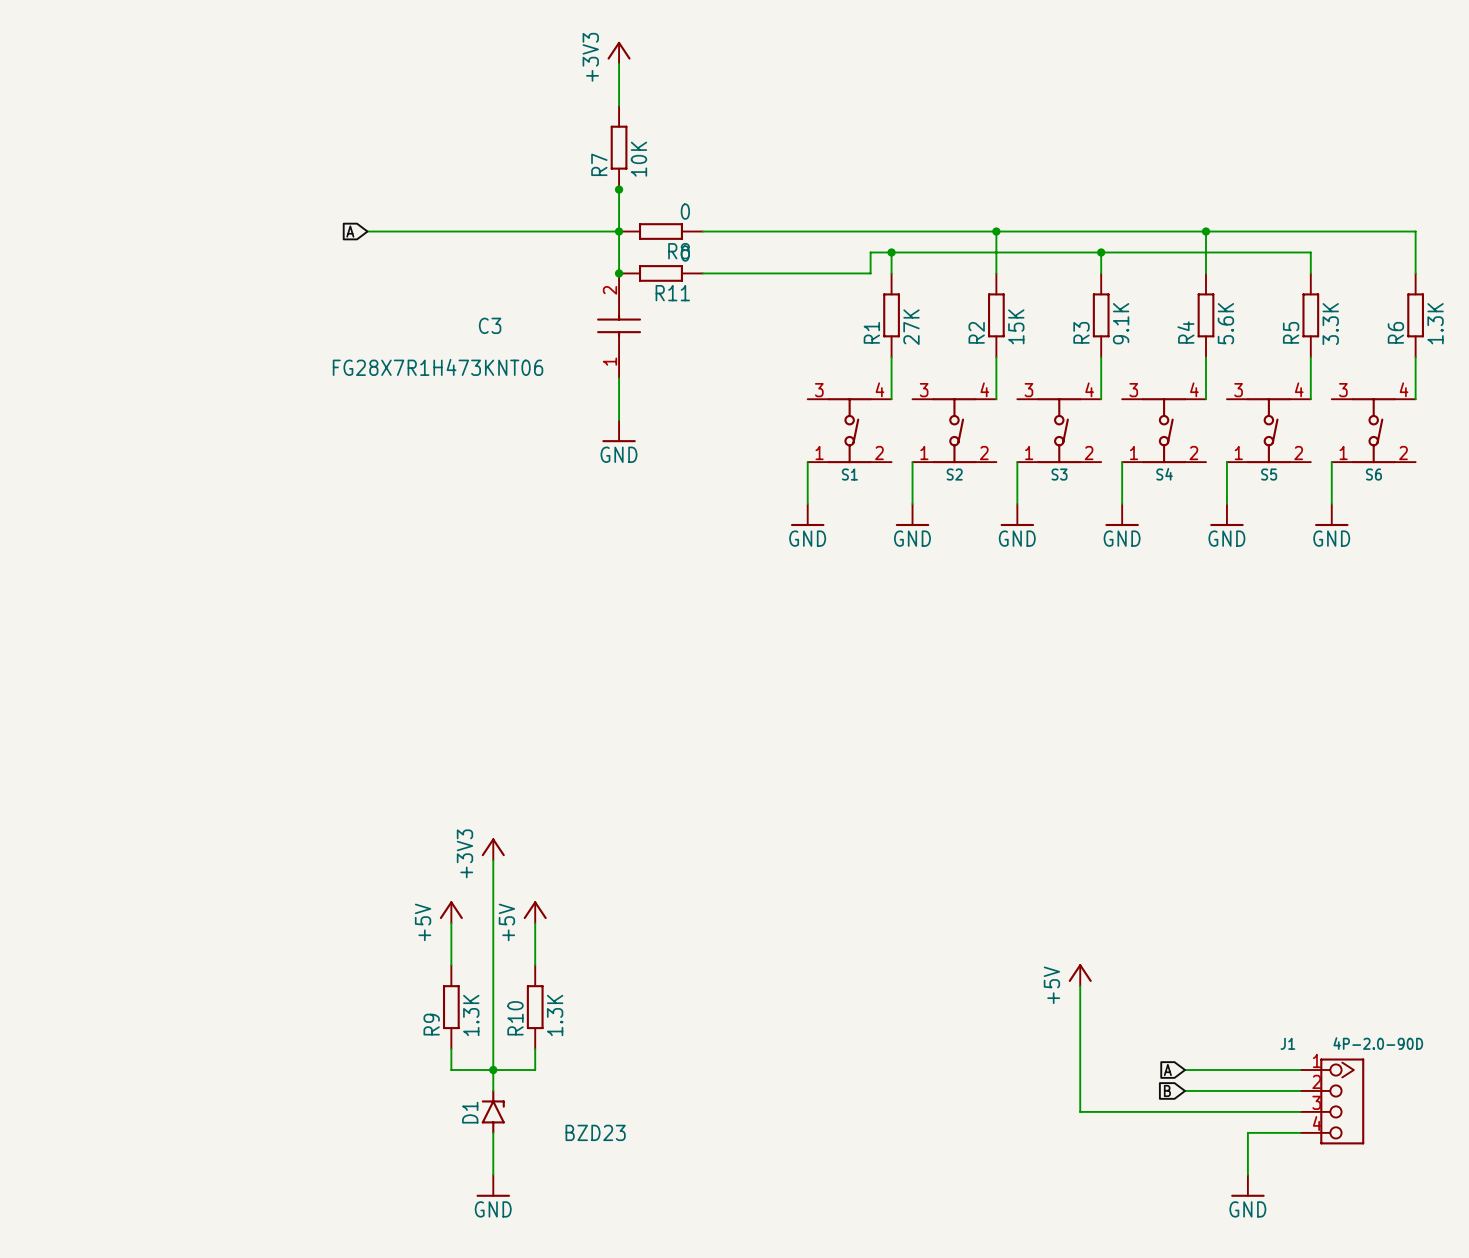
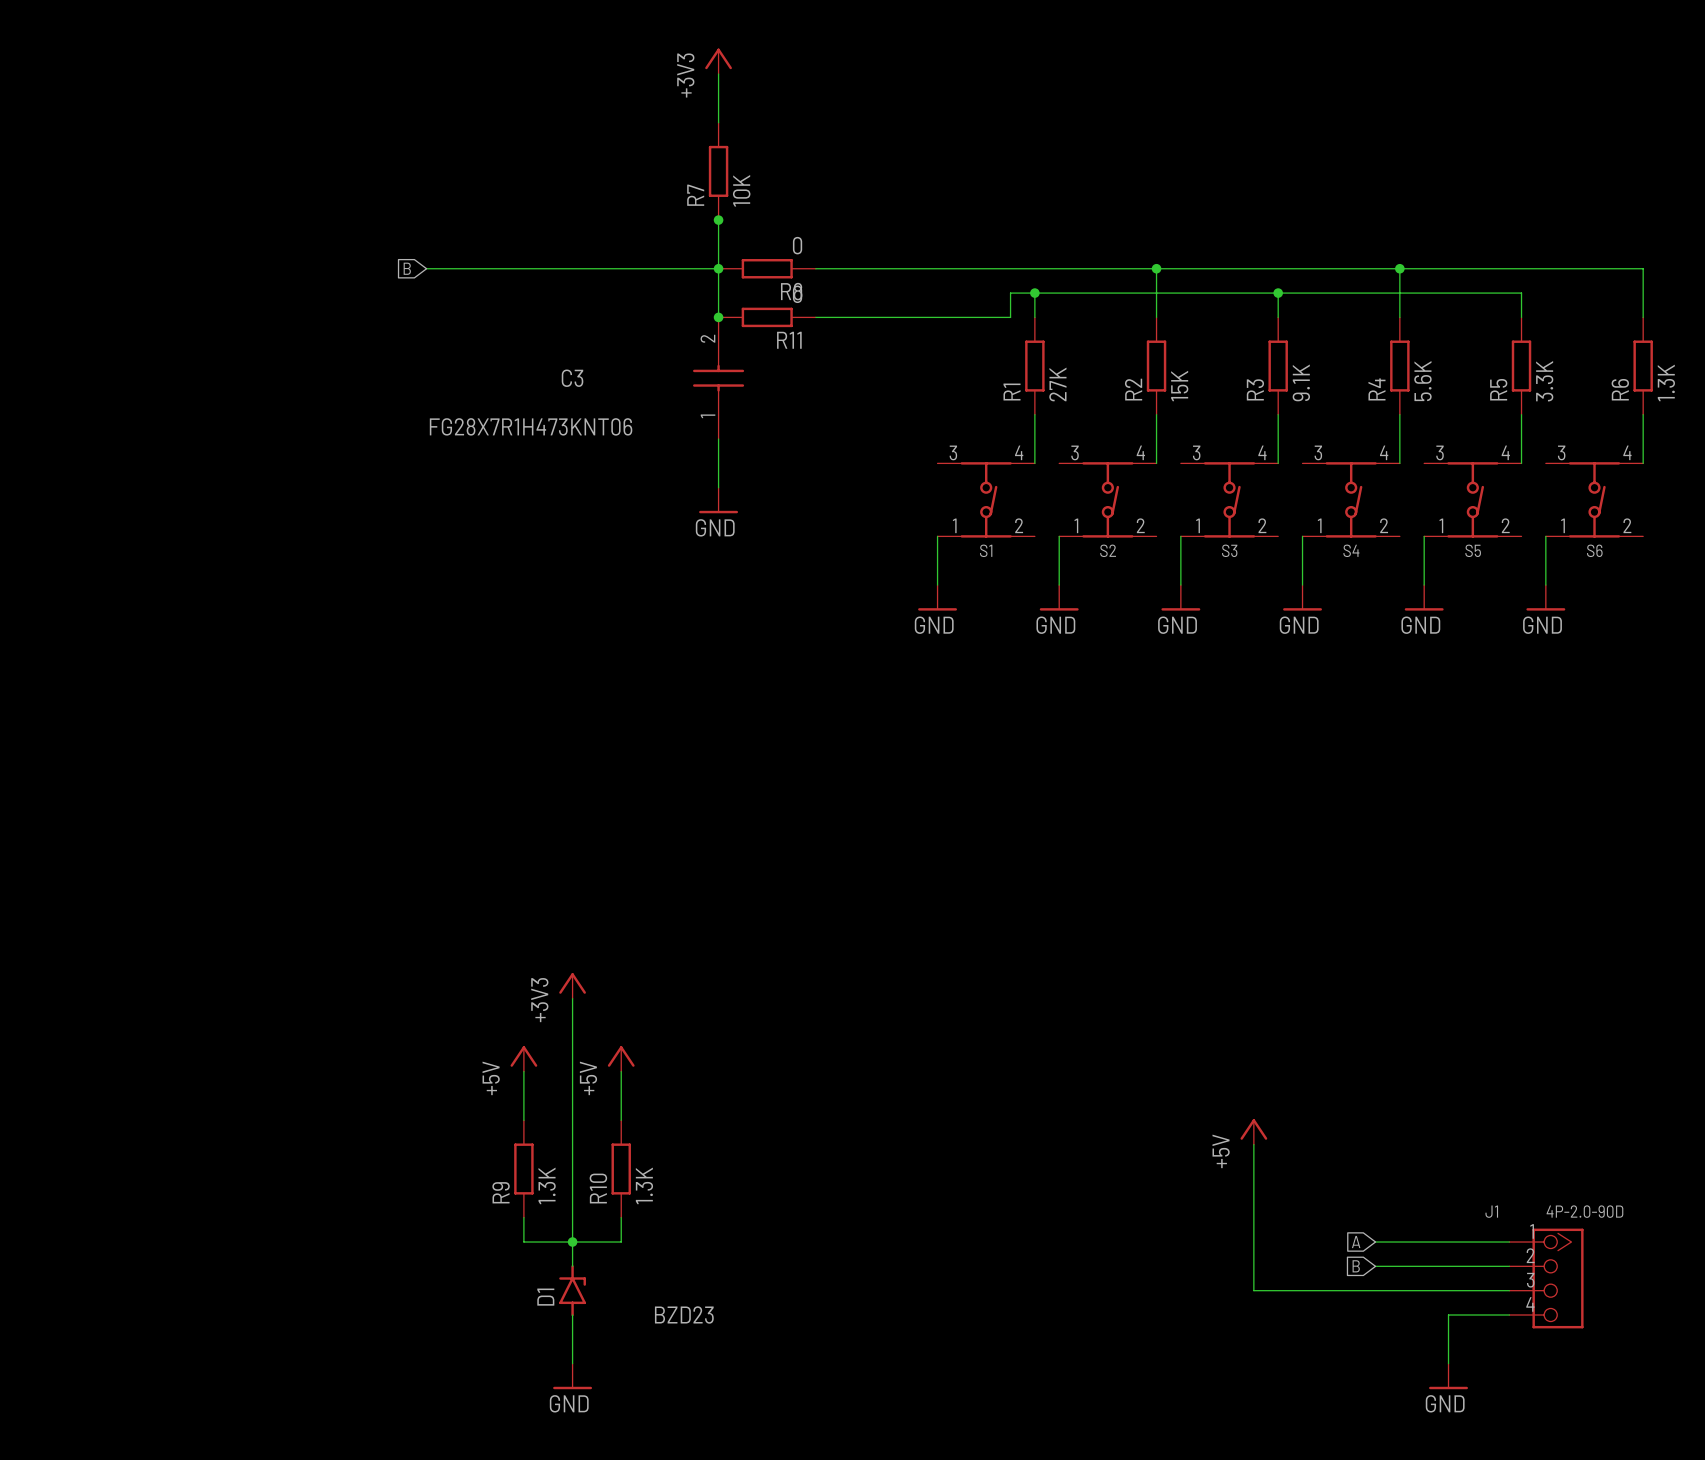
global label: A (350, 231) -> B (407, 268)

